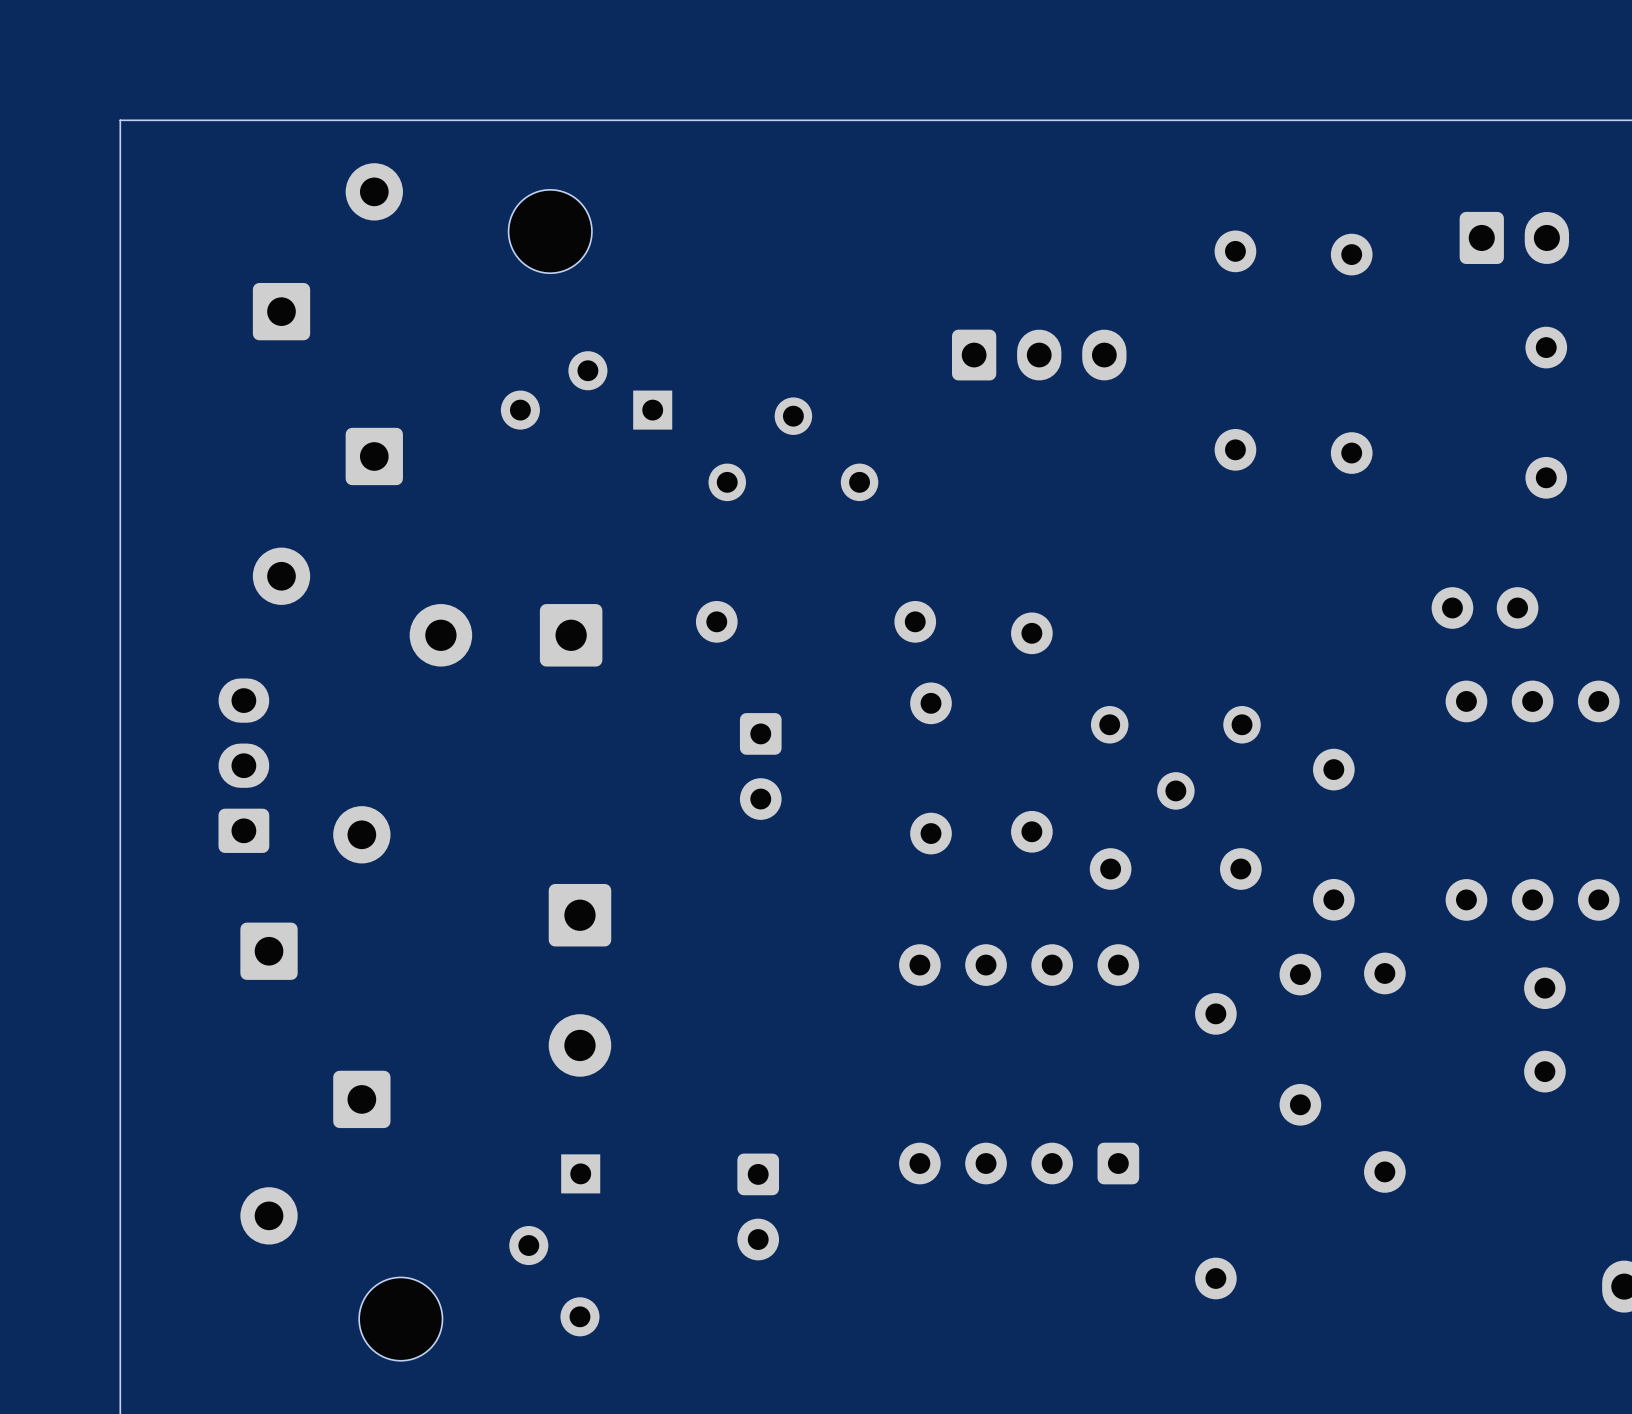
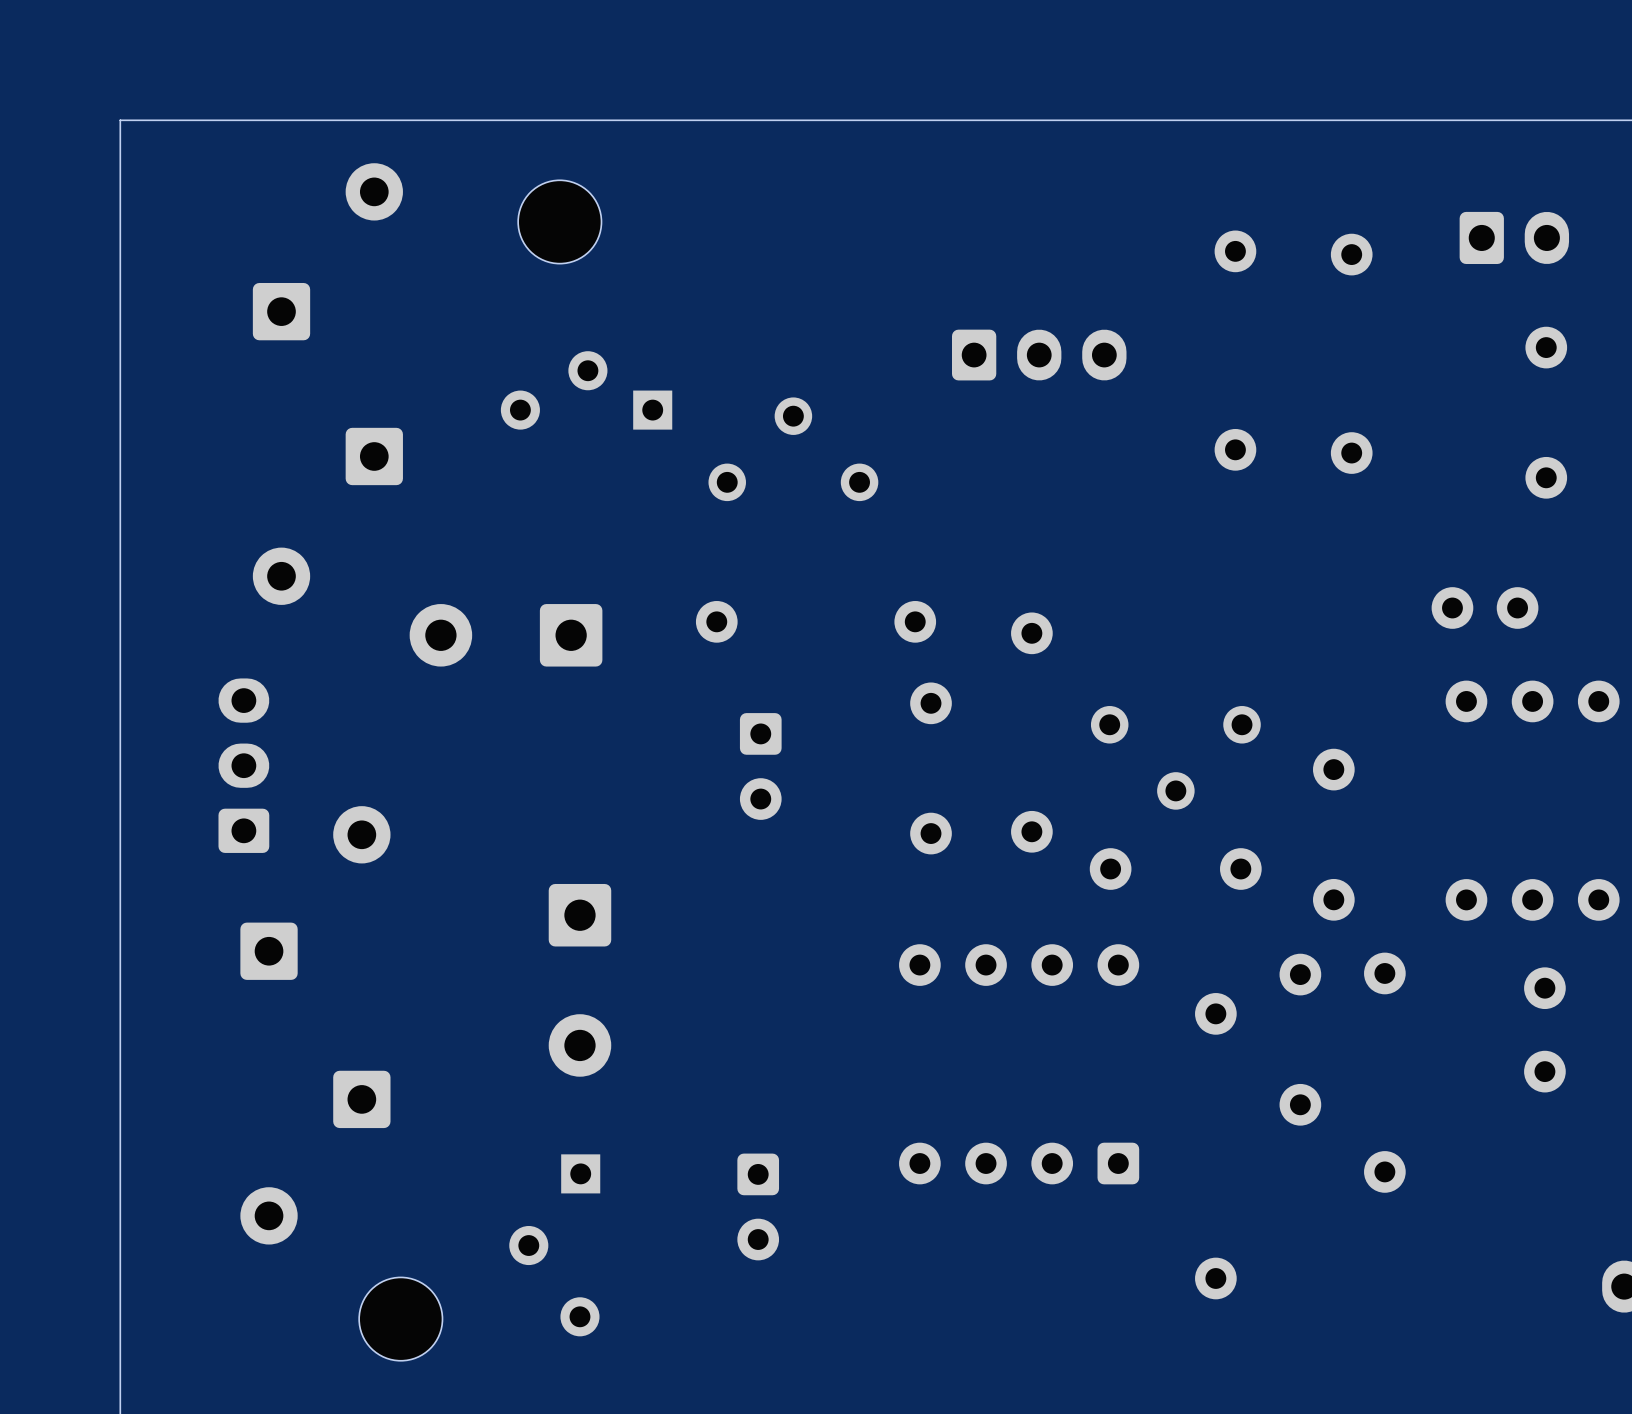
part position: (550, 231) -> (559, 221)

